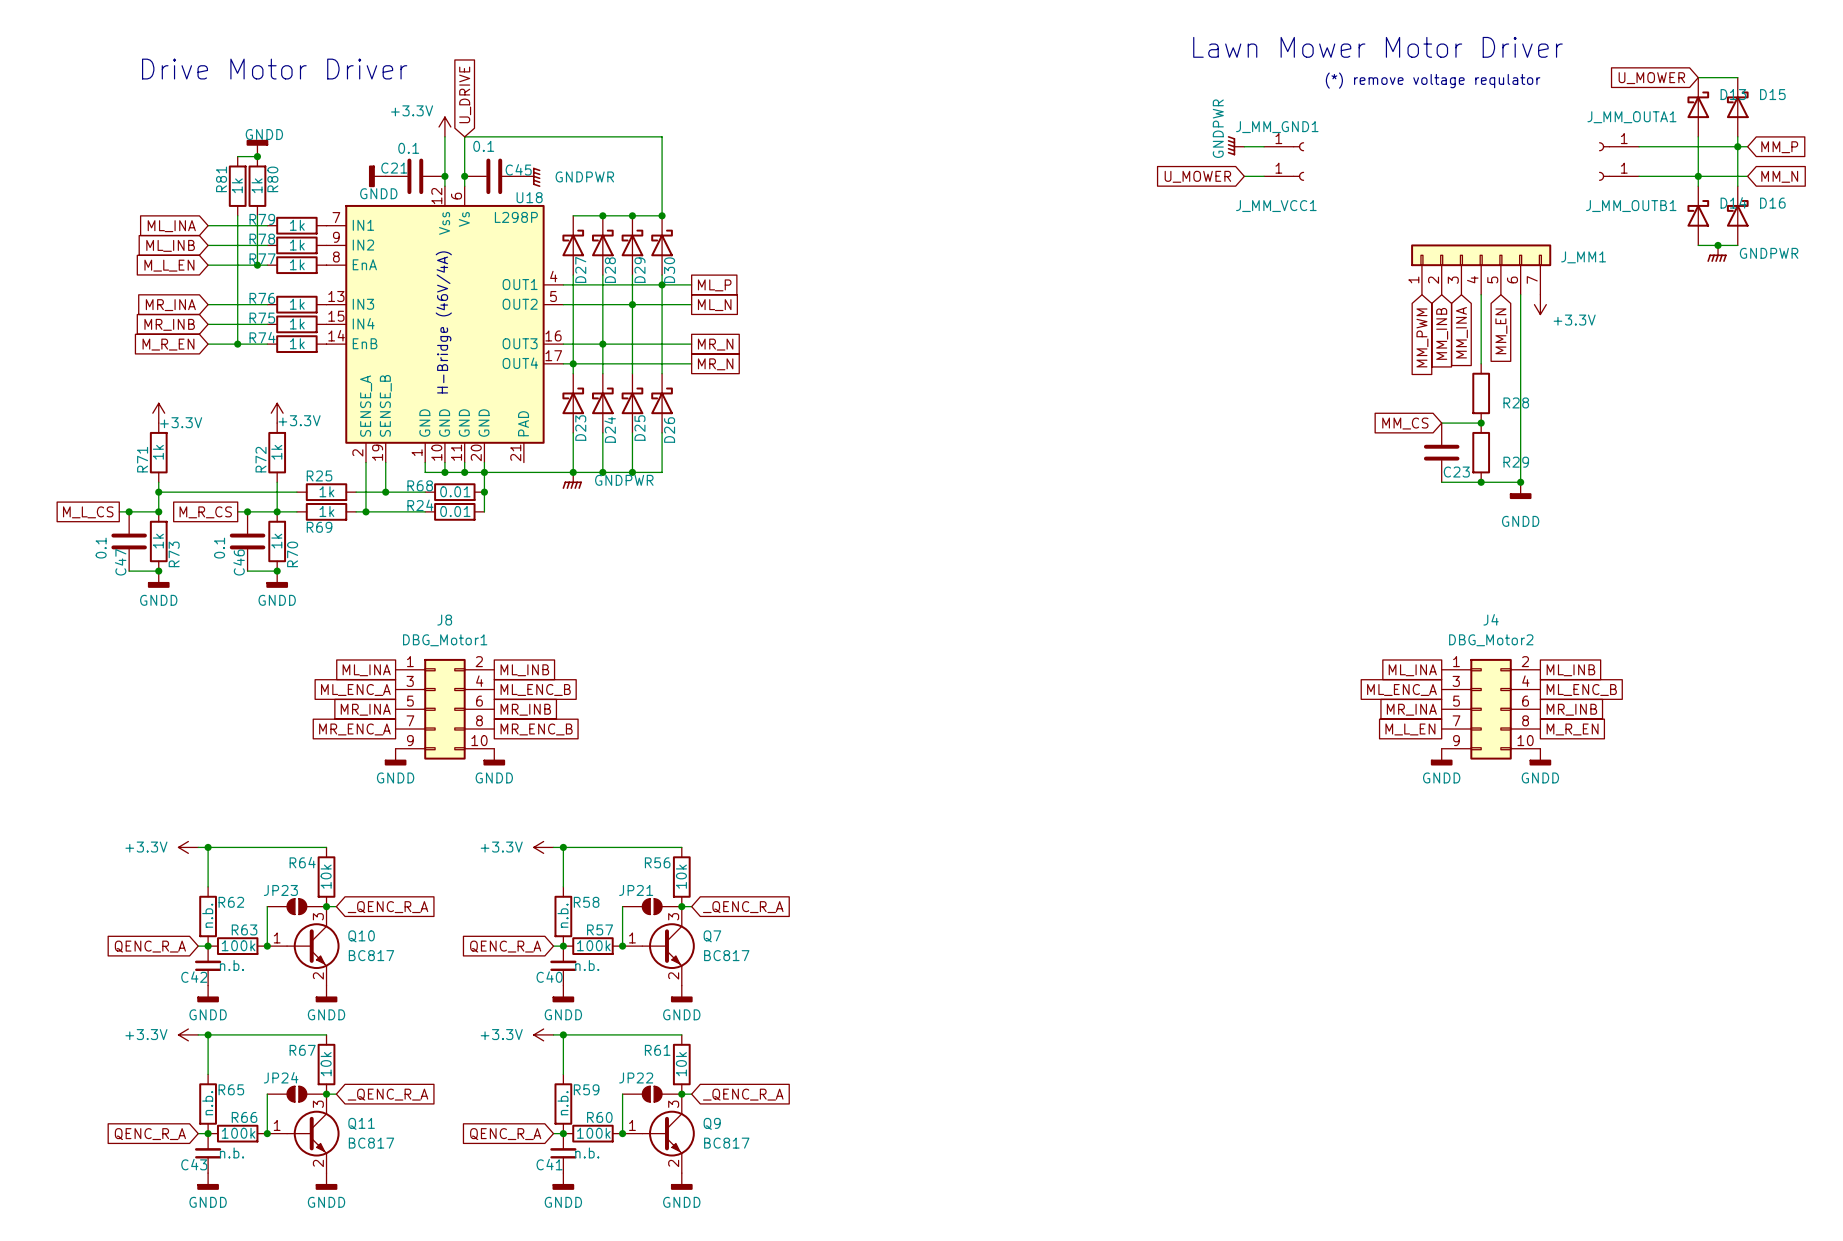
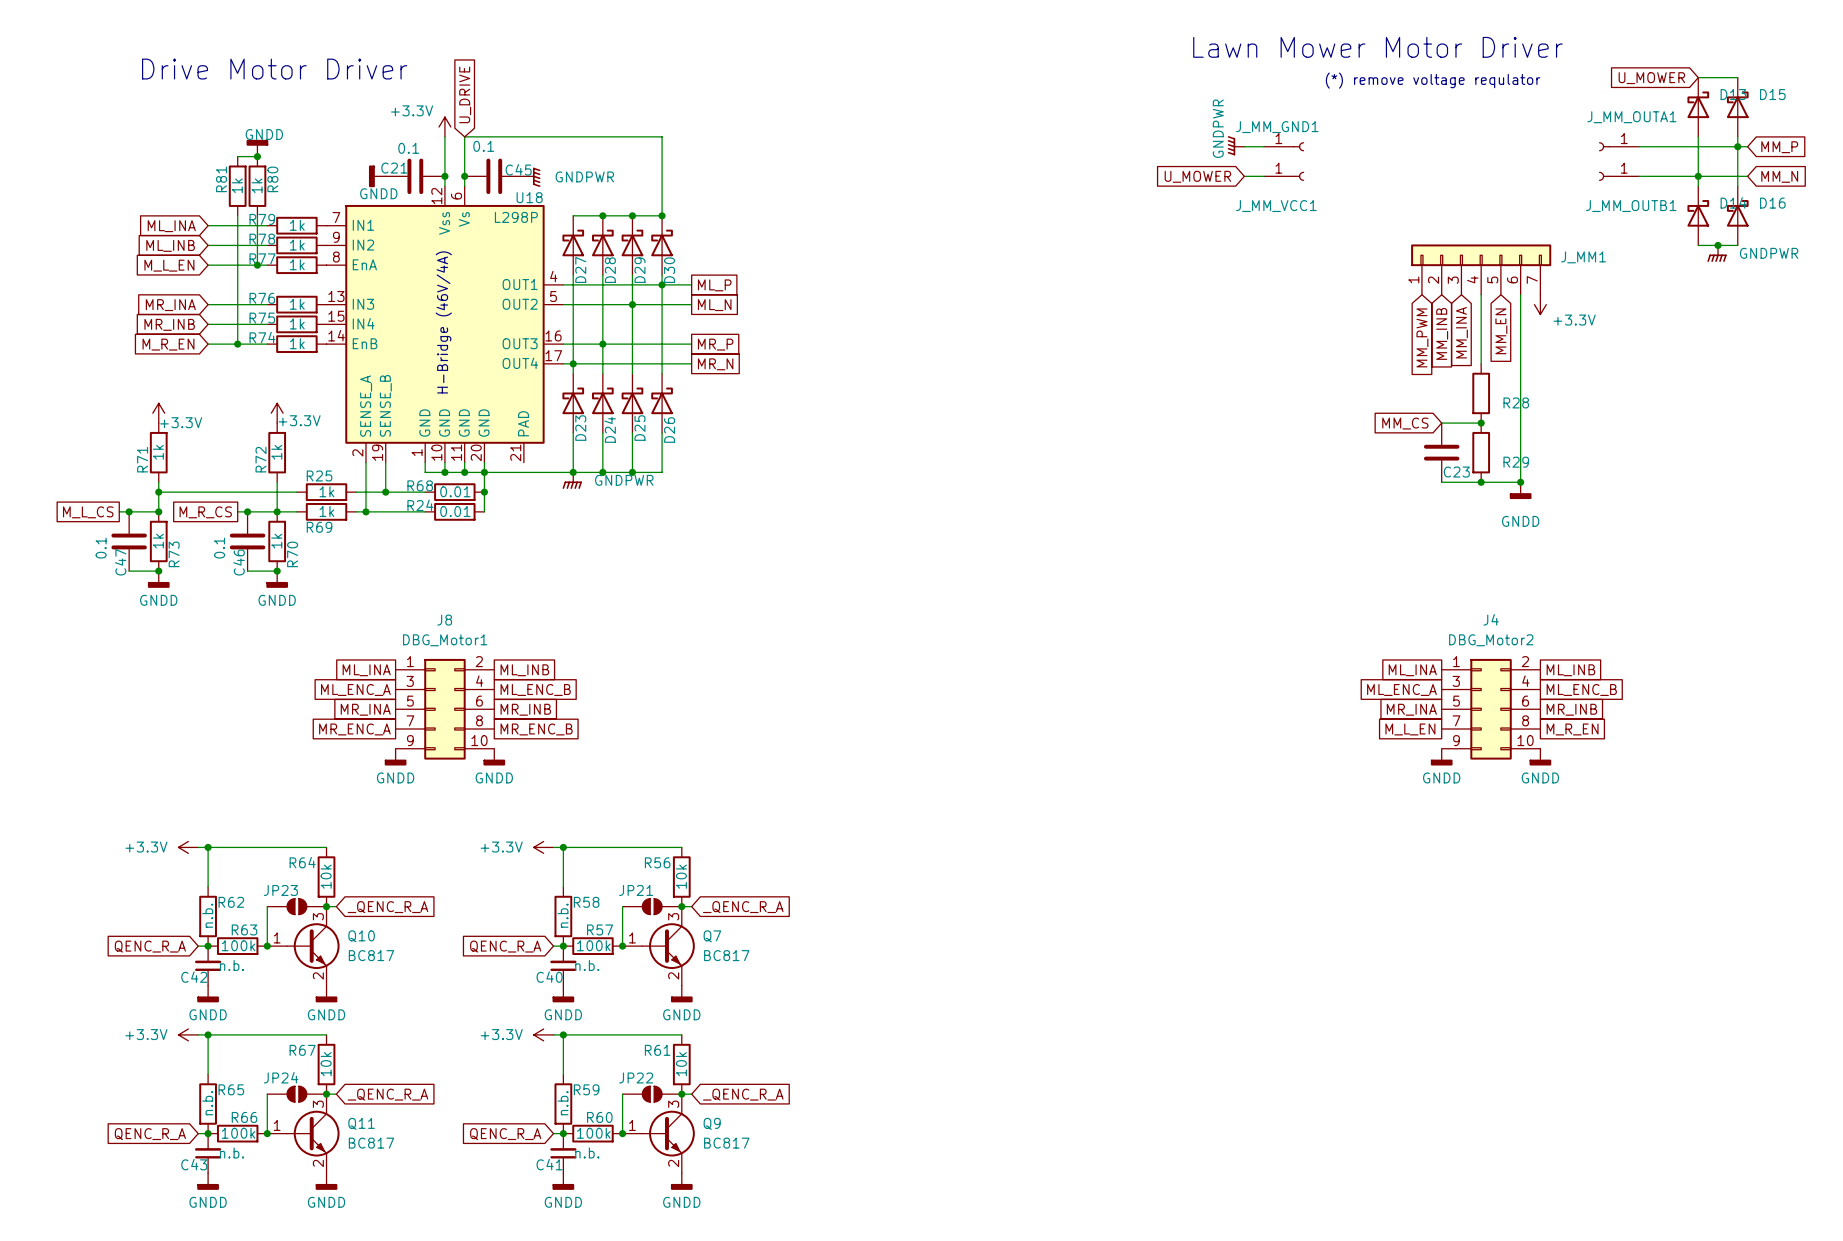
global label: MR_N (715, 344) -> MR_P (715, 344)

